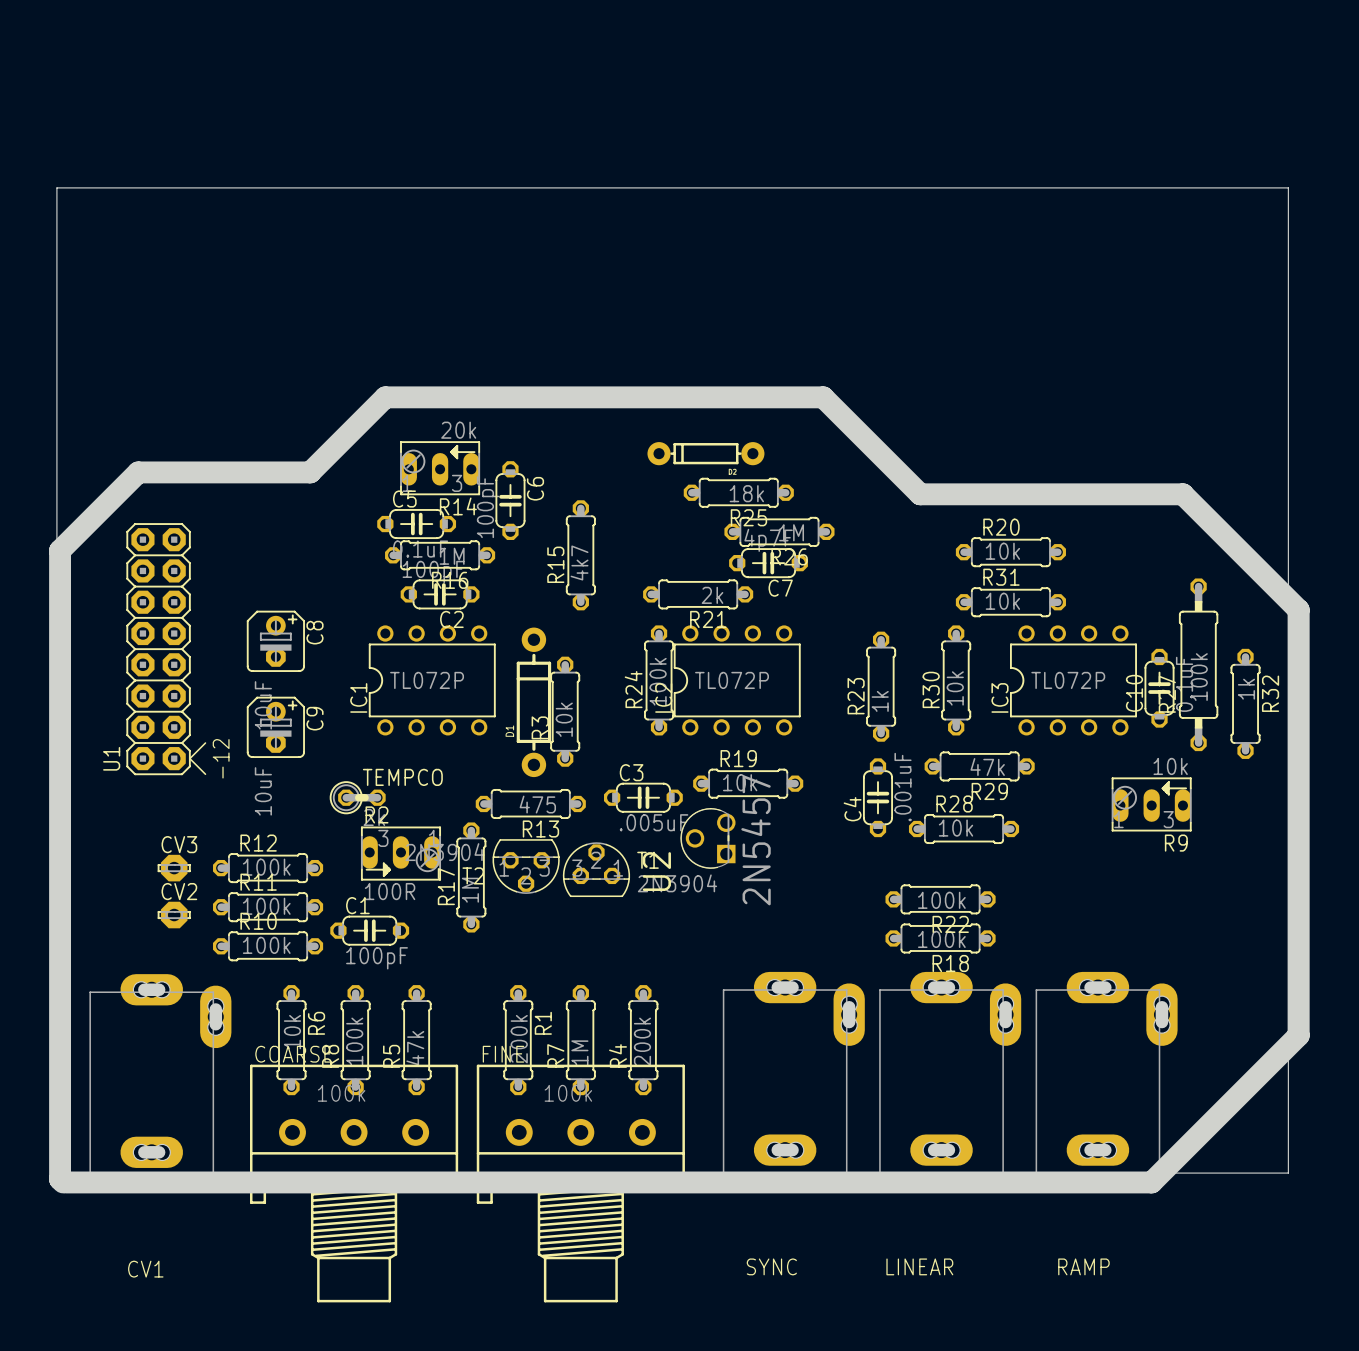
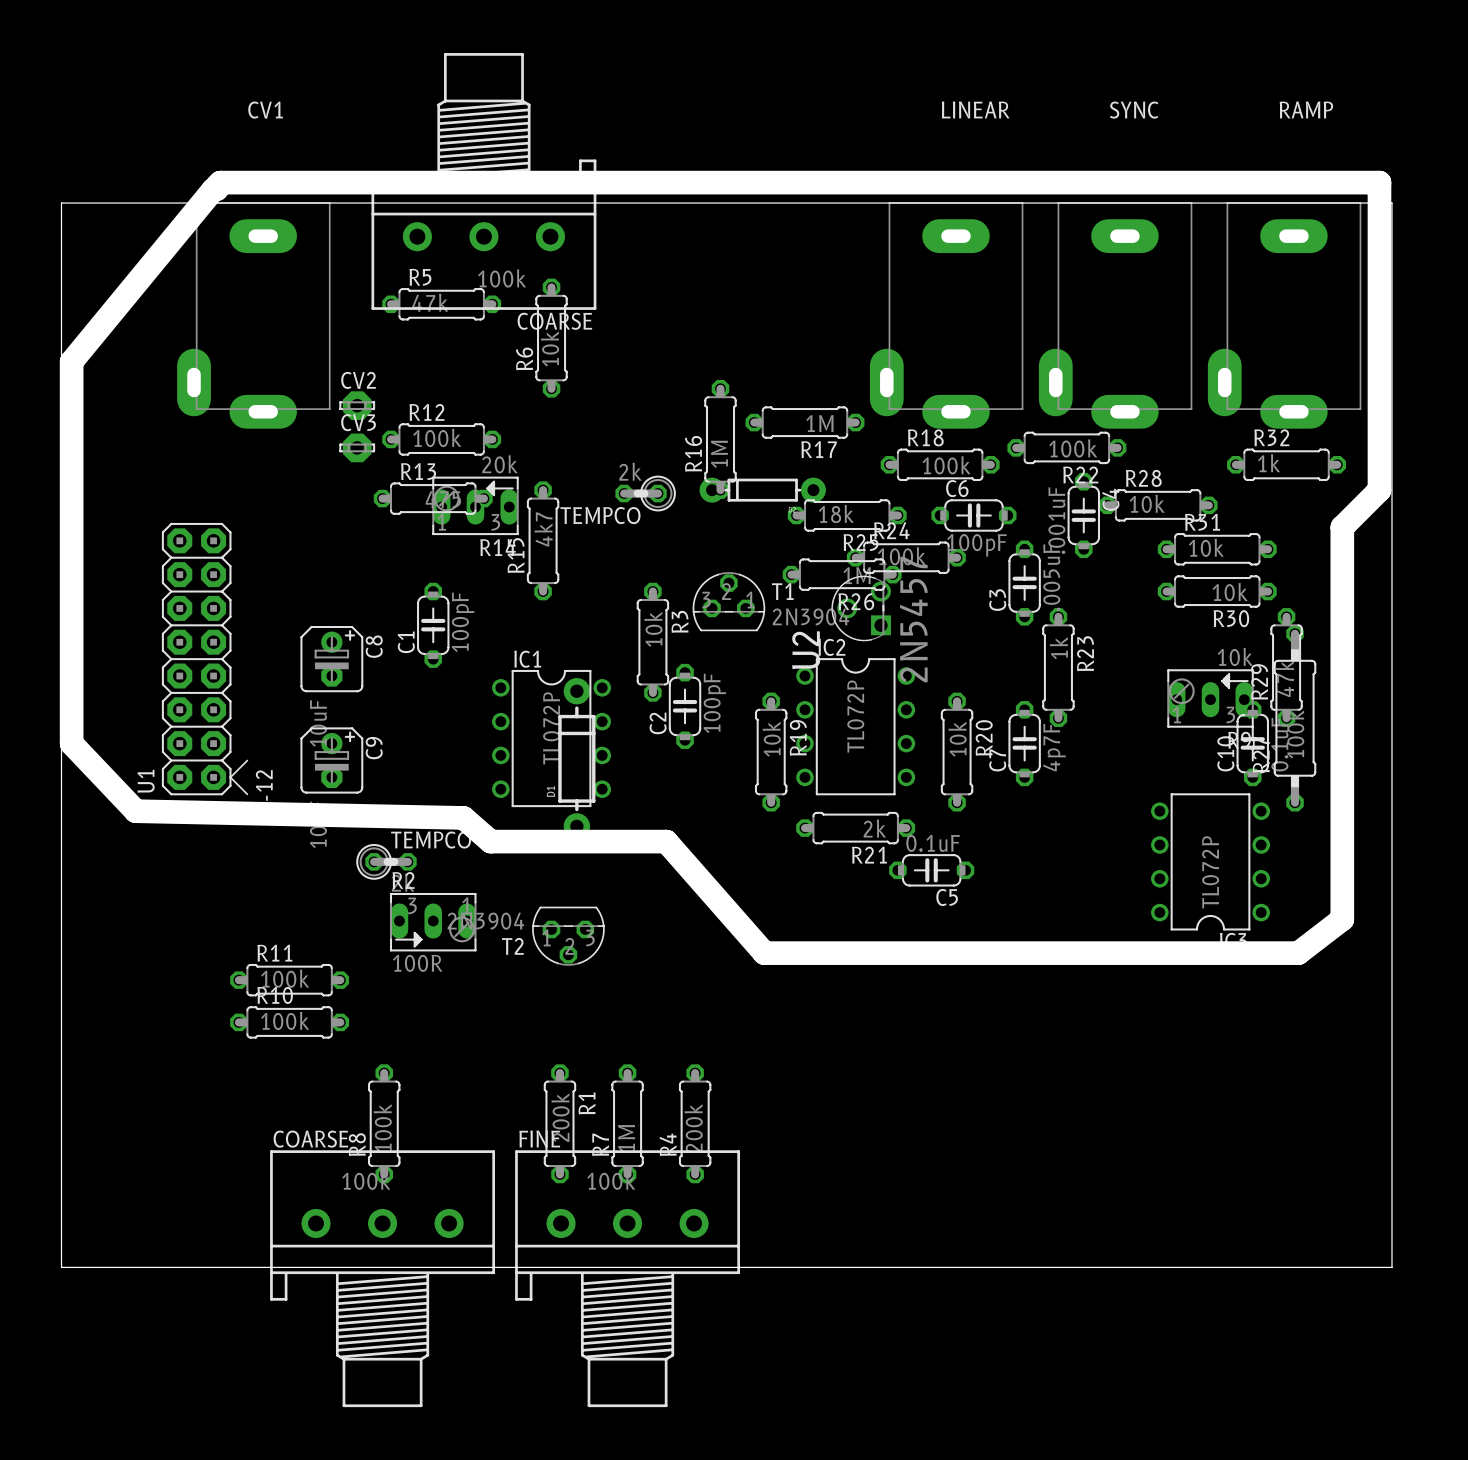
COARSE: none -> 100k (483, 181)
board edge: none -> (216, 185) (220, 182) (1379, 182) (1379, 490) (1342, 527) (1342, 919) (1298, 953) (764, 953) (666, 841) (490, 841) (463, 817) (135, 811) (71, 743) (71, 361) (213, 189) (216, 189)
LINEAR: none -> (946, 315)
SYNC: none -> (1115, 315)
RAMP: none -> (1284, 315)
TEMPCO: none -> 2k (645, 493)
R25 position: (738, 492) -> (847, 515)
R25 value position: 18k (746, 493) -> 18k (836, 514)
C6 rotation: 0° (510, 500) -> 90° counterclockwise (973, 515)
C6 position: (510, 500) -> (973, 515)
C5 rotation: 0° (416, 524) -> 180° (931, 870)
C5 position: (416, 524) -> (931, 870)
R20 rotation: 0° (1010, 552) -> 90° clockwise (957, 752)
R20 position: (1010, 552) -> (957, 752)
R16 rotation: 0° (440, 555) -> 90° clockwise (720, 439)
R16 position: (440, 555) -> (720, 439)
R15 position: (580, 555) -> (543, 540)
R15 value position: 4k7 (579, 563) -> 4k7 (543, 529)
C7 rotation: 0° (768, 563) -> 90° clockwise (1024, 743)
C7 position: (768, 563) -> (1024, 743)
C2 rotation: 0° (440, 594) -> 90° clockwise (685, 706)
C2 position: (440, 594) -> (685, 706)
R21 position: (698, 594) -> (855, 828)
R31 position: (1010, 602) -> (1217, 549)
C8 position: (275, 641) -> (331, 659)
U1 position: (166, 649) -> (205, 659)
IC1 rotation: 0° (432, 680) -> 90° clockwise (551, 738)
IC1 position: (432, 680) -> (551, 738)
R24 rotation: 0° (659, 680) -> 90° clockwise (906, 557)
R24 position: (659, 680) -> (906, 557)
IC2 rotation: 0° (737, 680) -> 90° clockwise (855, 726)
R30 rotation: 0° (956, 680) -> 90° clockwise (1217, 591)
R30 position: (956, 680) -> (1217, 591)
IC3 rotation: 0° (1073, 680) -> 90° counterclockwise (1210, 861)
IC3 position: (1073, 680) -> (1210, 861)
R23 position: (881, 686) -> (1058, 667)
R30 name position: R30 (931, 689) -> R30 (1231, 618)
R32 name position: R32 (1270, 693) -> R32 (1271, 437)
R23 name position: R23 (856, 696) -> R23 (1085, 653)
R23 value position: 1k (880, 701) -> 1k (1058, 648)
R32 rotation: 0° (1245, 703) -> 90° clockwise (1286, 464)
R32 position: (1245, 703) -> (1286, 464)
R3 position: (565, 711) -> (652, 642)
R3 value position: 10k (564, 719) -> 10k (653, 629)
C9 position: (275, 727) -> (331, 760)
R3 name position: R3 (540, 727) -> R3 (679, 621)
R29 rotation: 0° (979, 766) -> 90° clockwise (1286, 667)
R29 position: (979, 766) -> (1286, 667)
R19 rotation: 0° (748, 783) -> 90° clockwise (771, 752)
R19 position: (748, 783) -> (771, 752)
C3 rotation: 0° (643, 797) -> 90° counterclockwise (1024, 583)
C3 position: (643, 797) -> (1024, 583)
C4 rotation: 0° (877, 797) -> 180° (1083, 515)
C4 position: (877, 797) -> (1083, 515)
R13 position: (530, 803) -> (433, 498)
R9 position: (1151, 804) -> (1210, 698)
R13 name position: R13 (540, 829) -> R13 (418, 471)
R28 position: (964, 829) -> (1158, 505)
U2 position: (708, 838) -> (861, 608)
CV3 position: (174, 868) -> (357, 447)
R12 position: (268, 868) -> (441, 439)
T1 position: (596, 869) -> (728, 601)
R17 rotation: 0° (471, 877) -> 90° clockwise (804, 422)
R17 position: (471, 877) -> (804, 422)
R17 name position: R17 (446, 886) -> R17 (819, 449)
R22 position: (940, 899) -> (1066, 447)
CV2 position: (174, 915) -> (357, 405)
C1 rotation: 0° (369, 930) -> 90° counterclockwise (433, 625)
C1 position: (369, 930) -> (433, 625)
R18 position: (940, 938) -> (940, 464)
R18 name position: R18 (950, 963) -> R18 (925, 437)
CV1 footprint: [89, 974, 232, 1184] -> [177, 202, 331, 429]
R6 name position: R6 (316, 1023) -> R6 (524, 358)
R6 value position: 10k (292, 1032) -> 10k (550, 348)
R6 position: (291, 1040) -> (551, 338)
R5 rotation: 0° (416, 1040) -> 90° clockwise (441, 304)
R5 position: (416, 1040) -> (441, 304)
SYNC: (793, 1076) -> none
LINEAR: (950, 1076) -> none
RAMP: (1106, 1076) -> none
board edge: (63, 1182) (60, 1179) (60, 550) (138, 472) (310, 472) (385, 397) (823, 397) (920, 494) (1182, 494) (1298, 610) (1298, 1035) (1151, 1182) (66, 1182) -> none
CV1 name position: CV1 (145, 1269) -> CV1 (265, 110)

